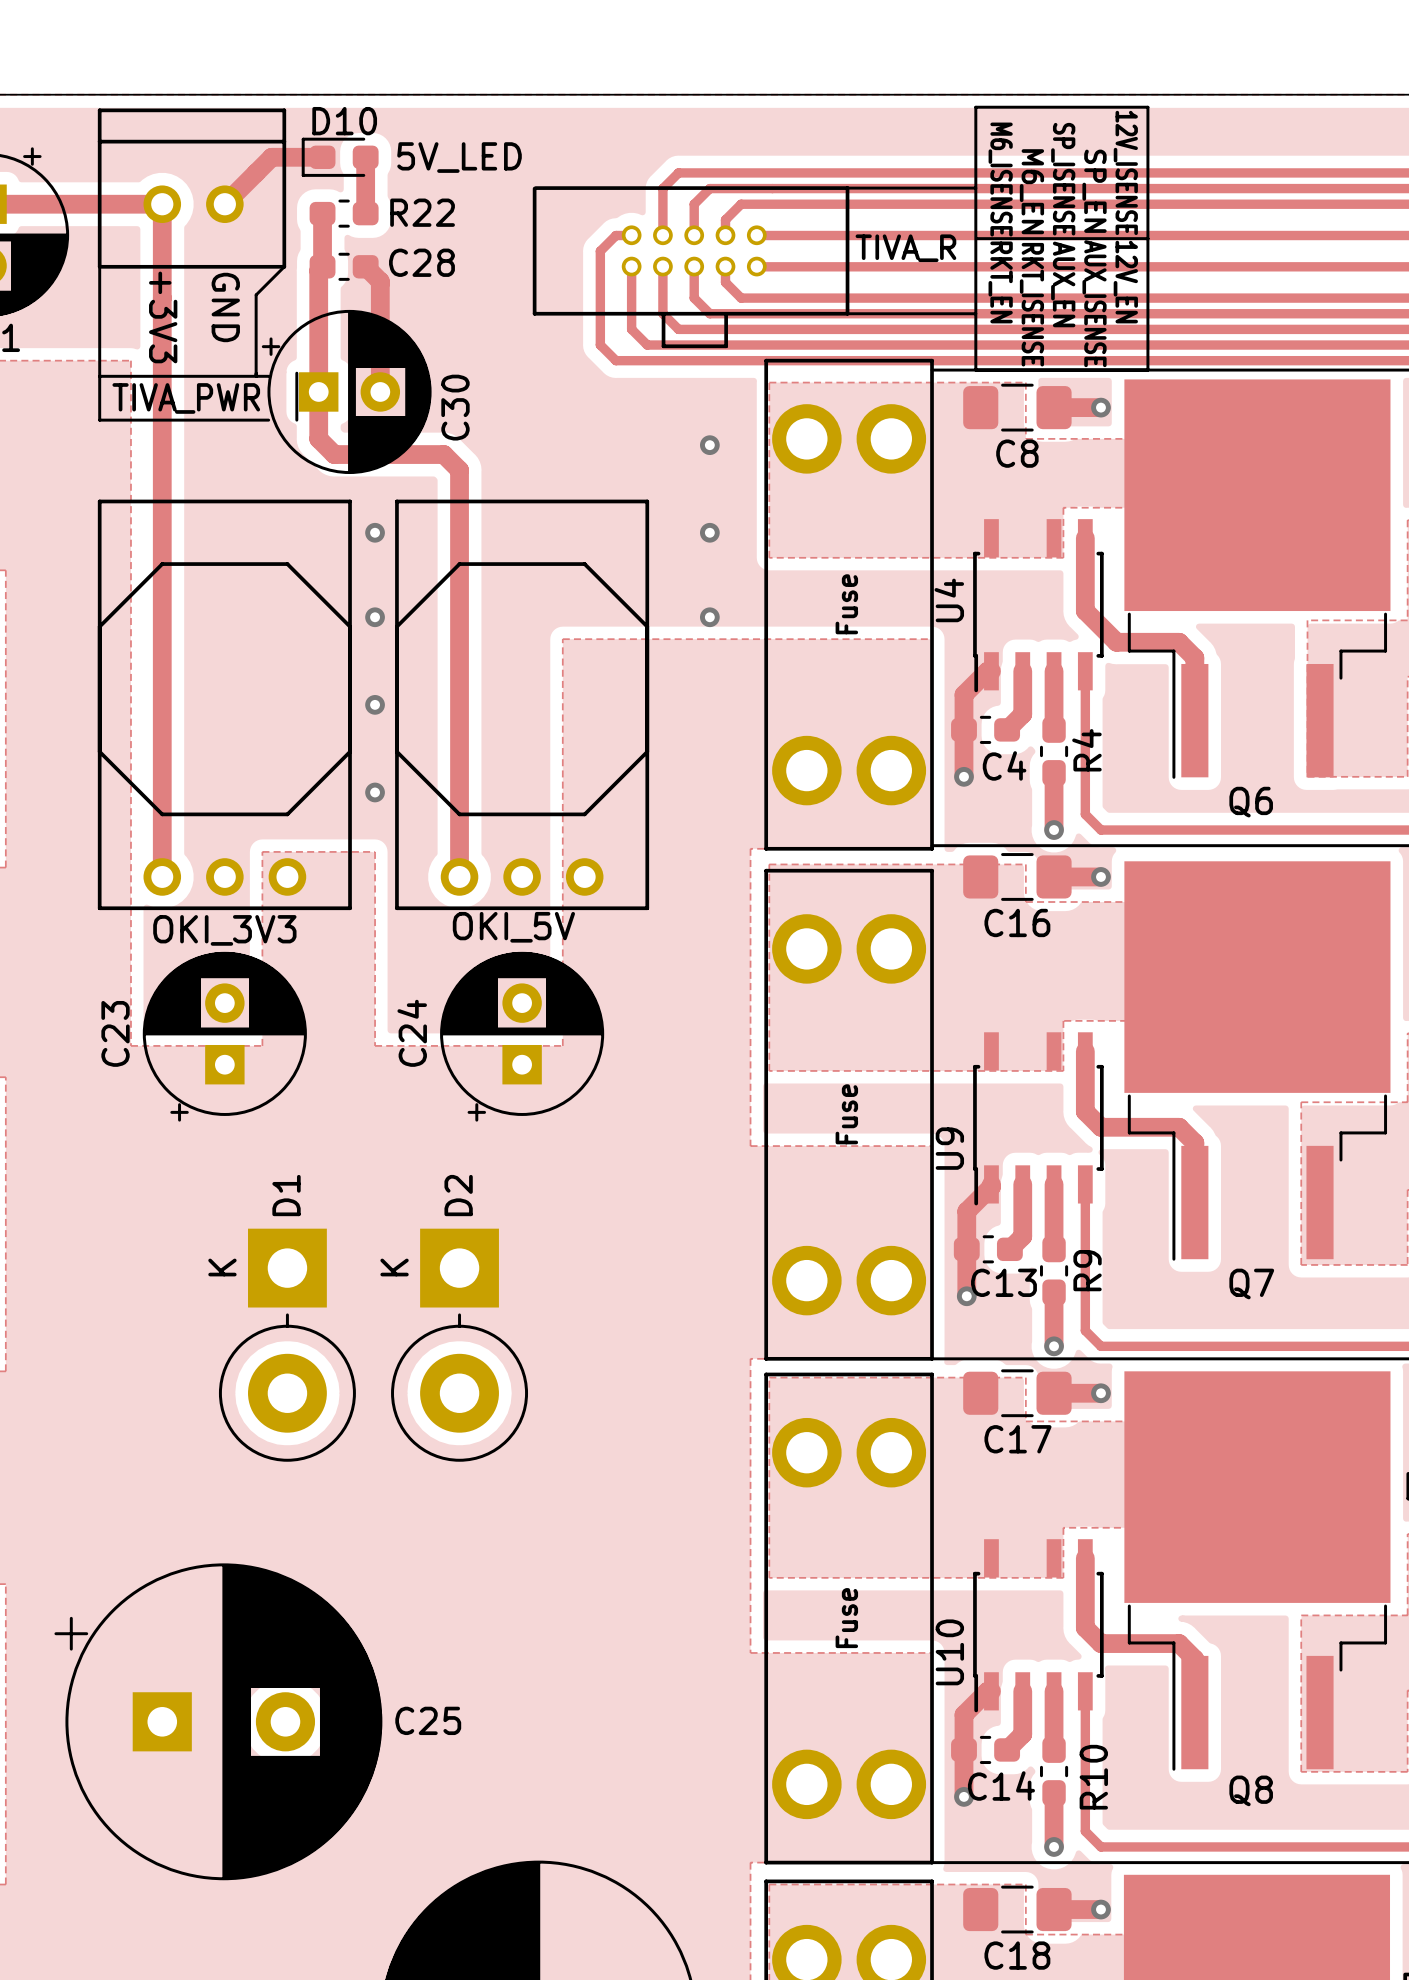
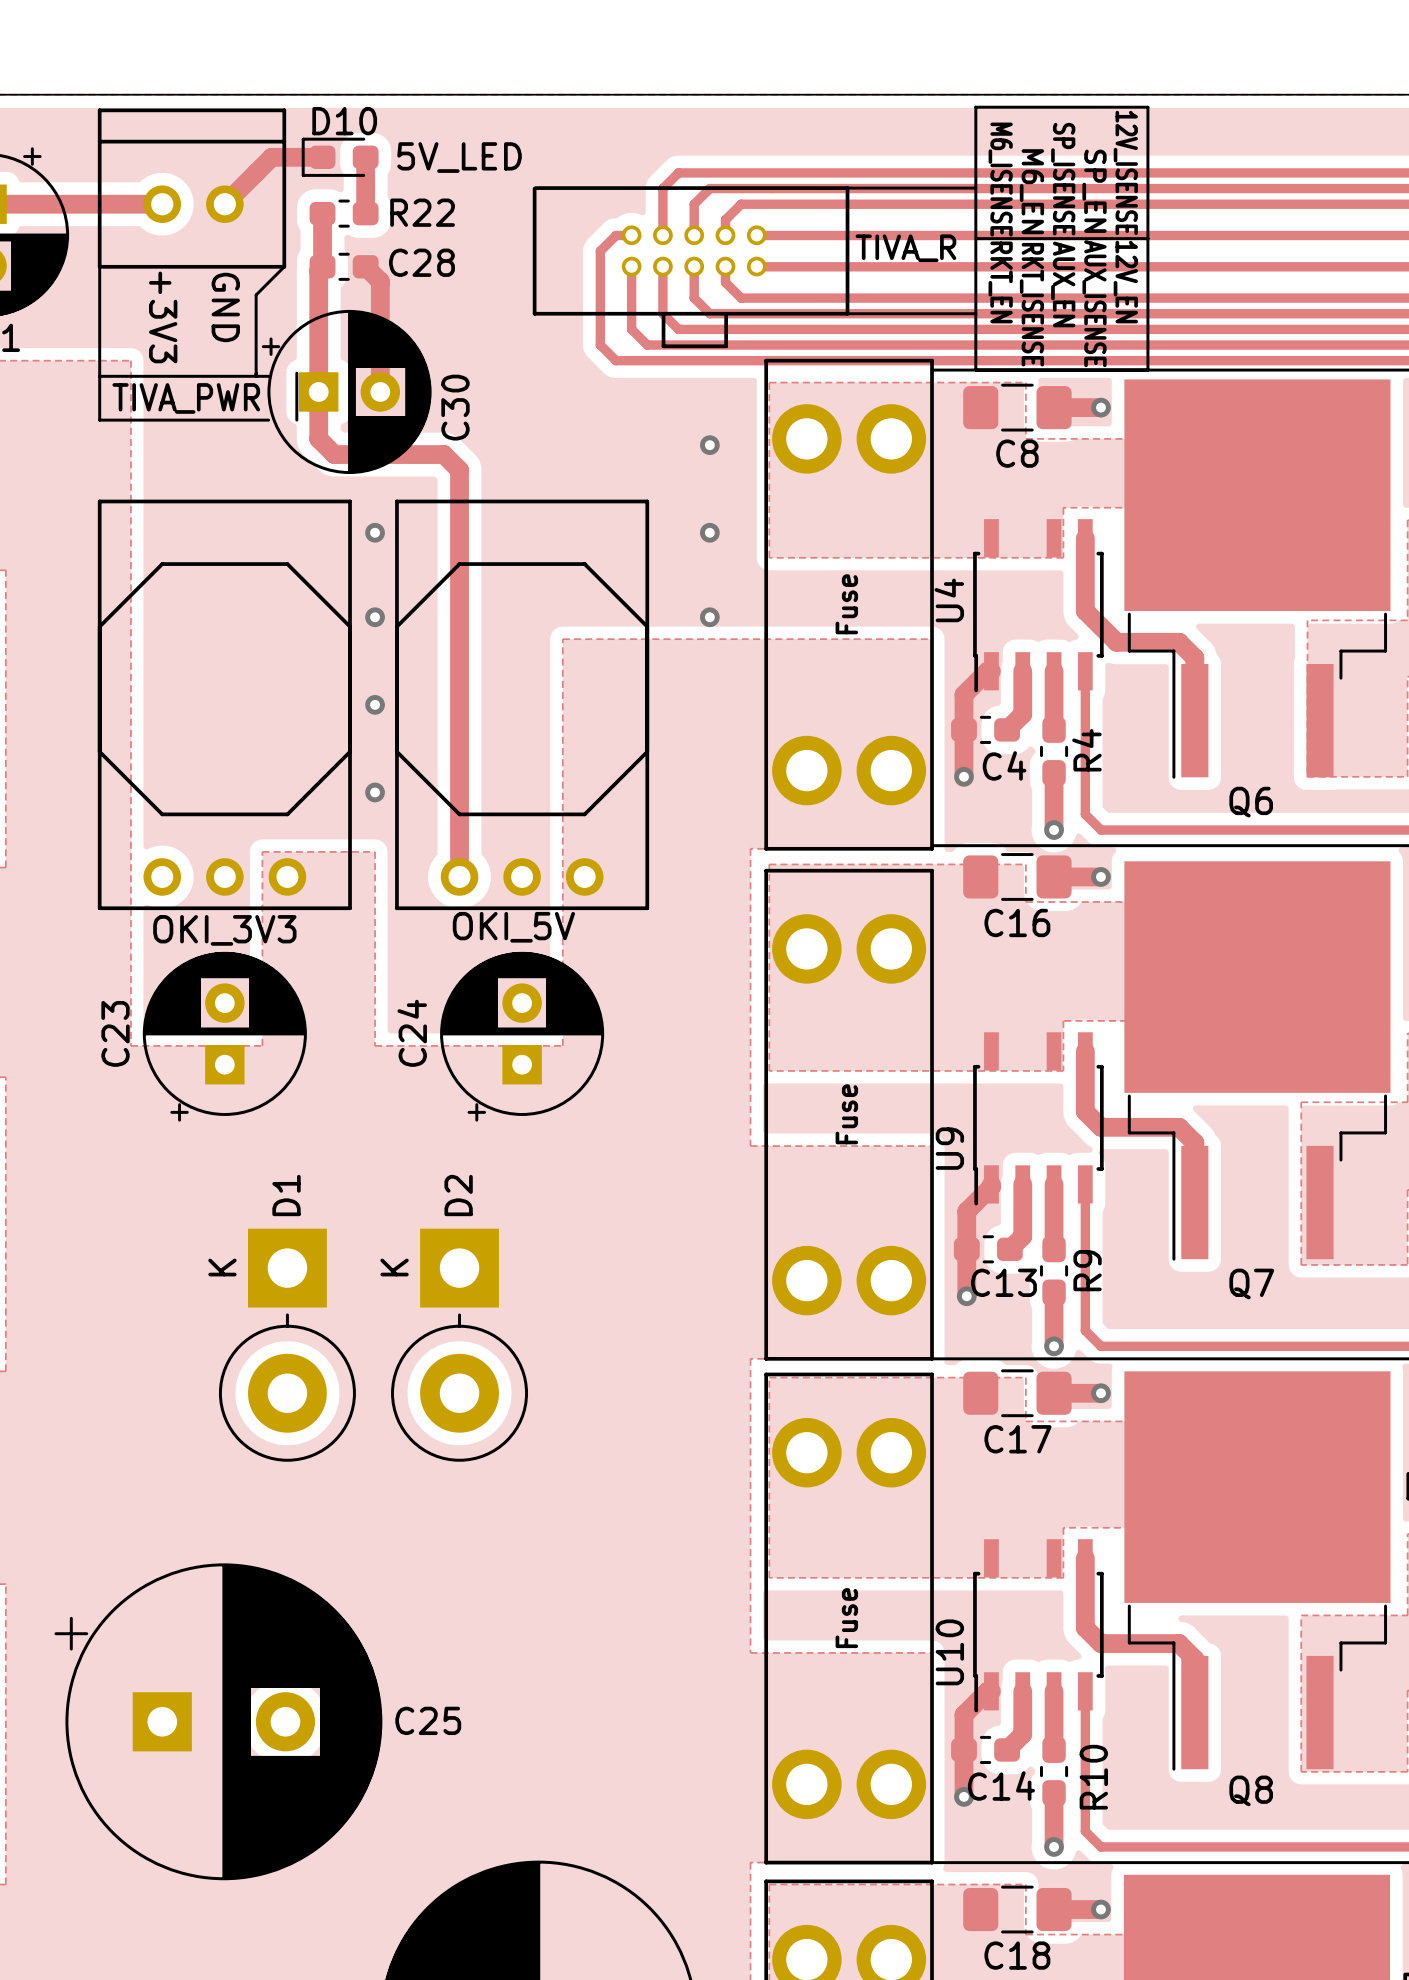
track: (162, 204) (162, 876) -> none

